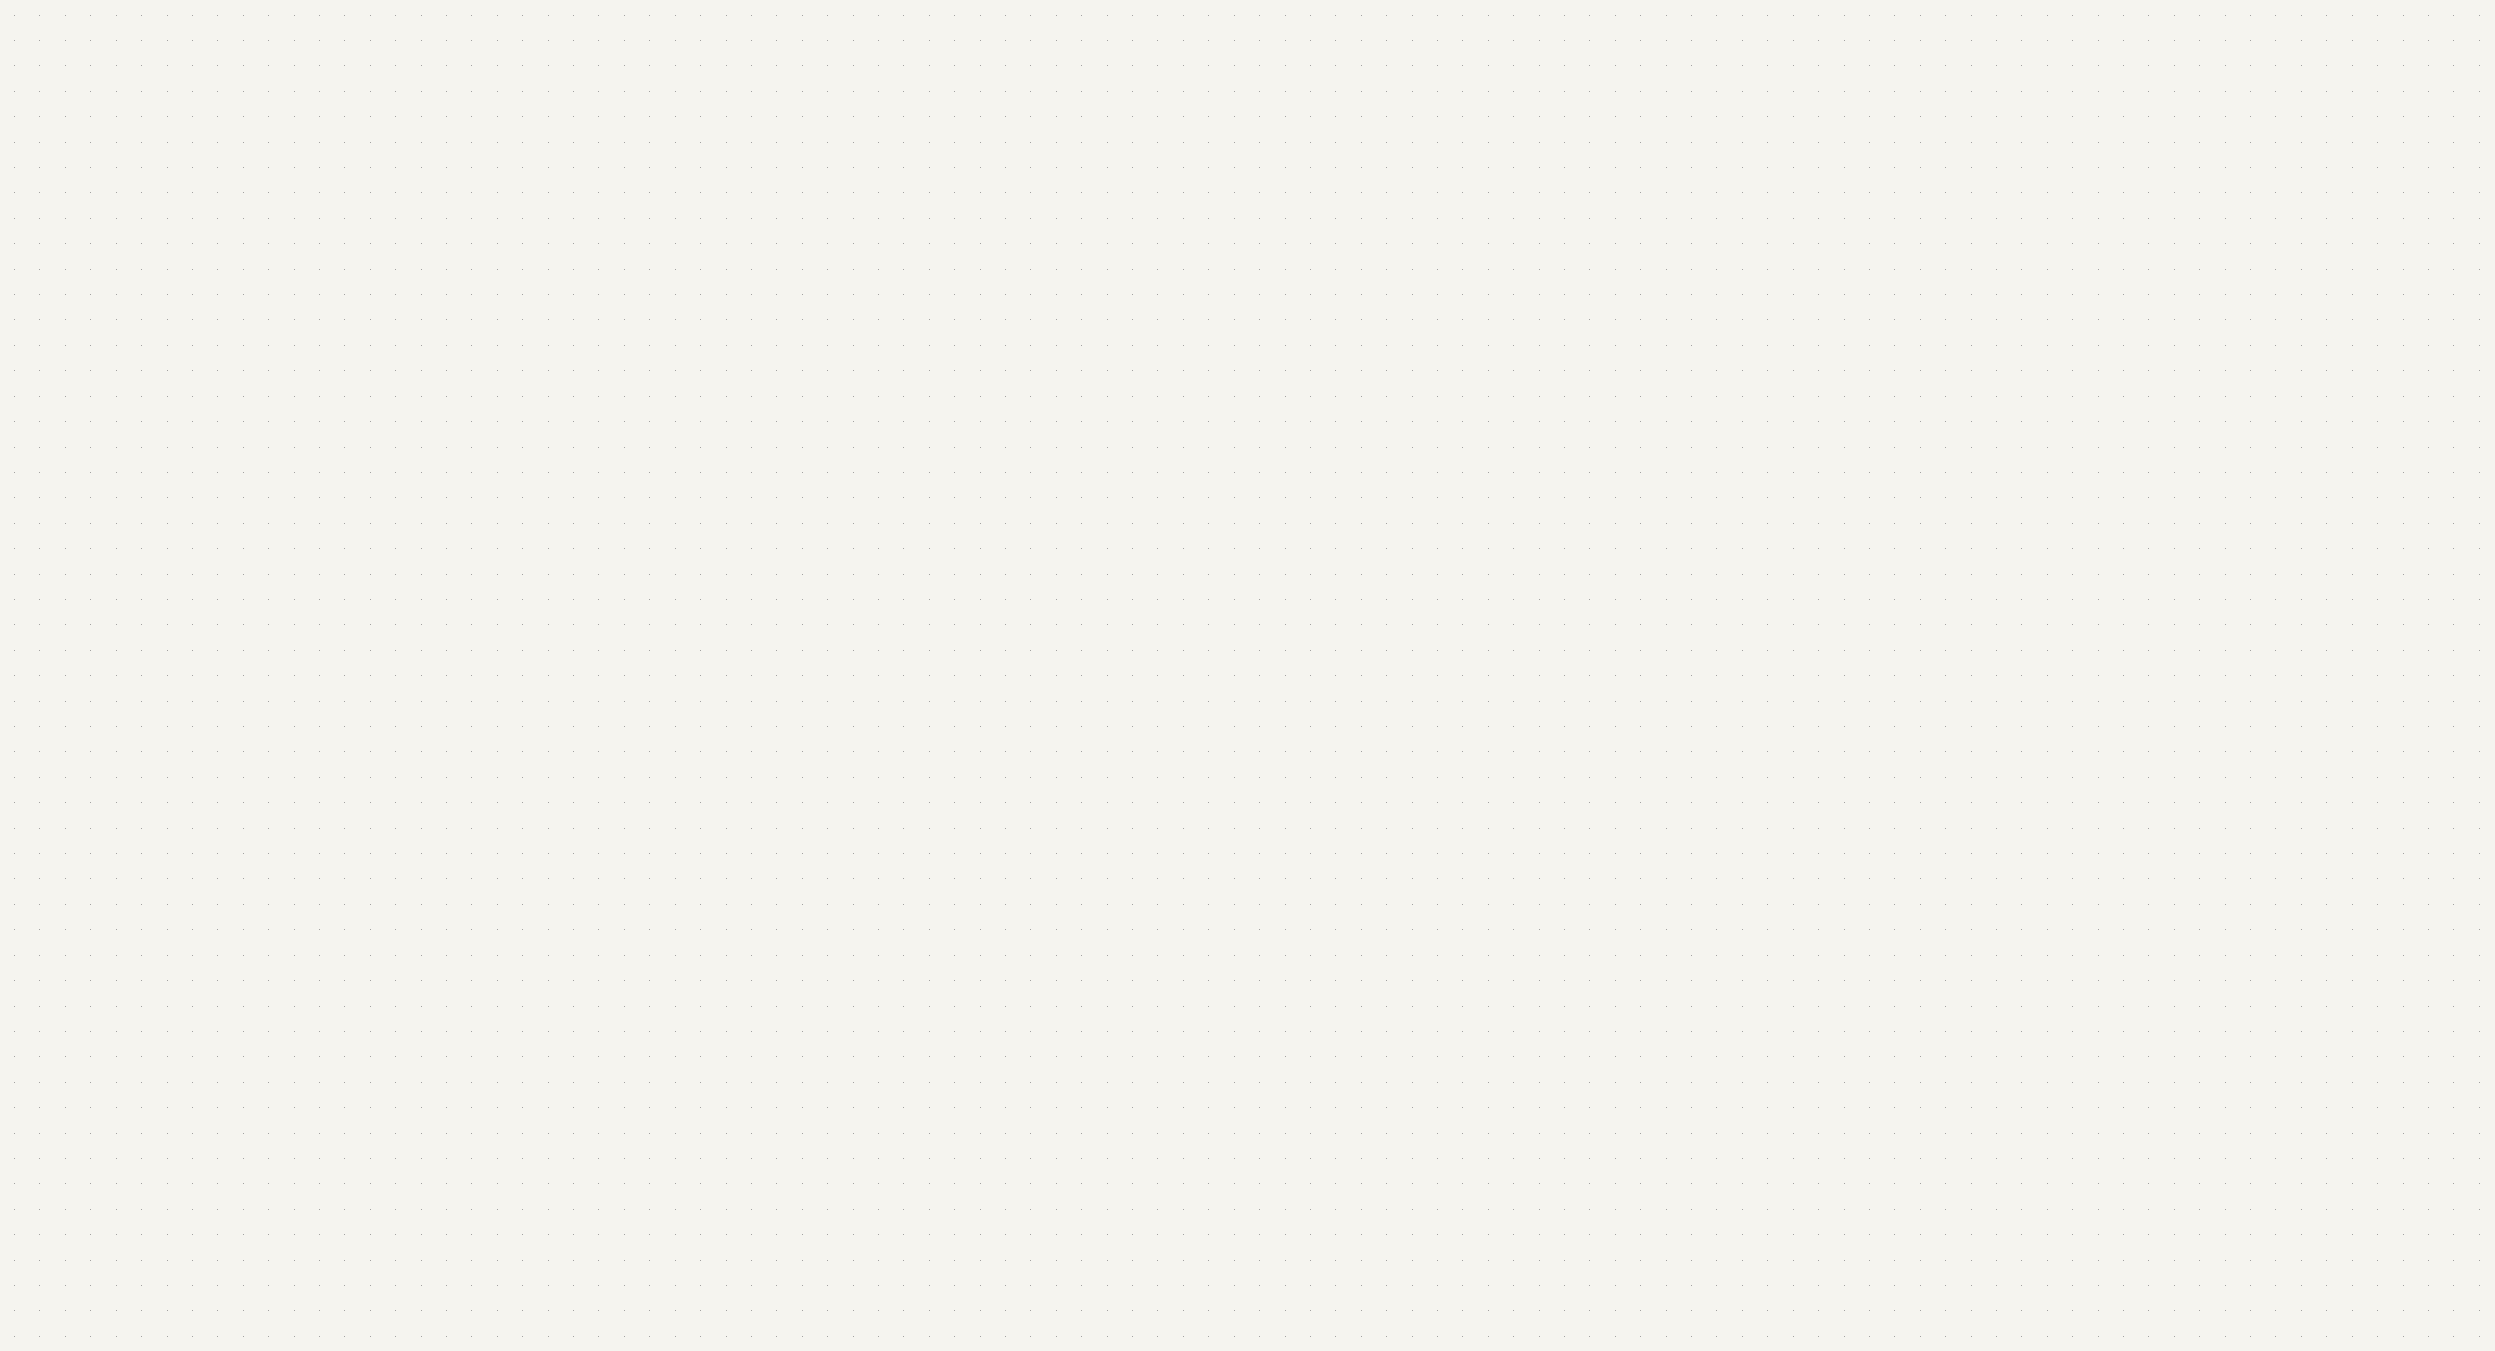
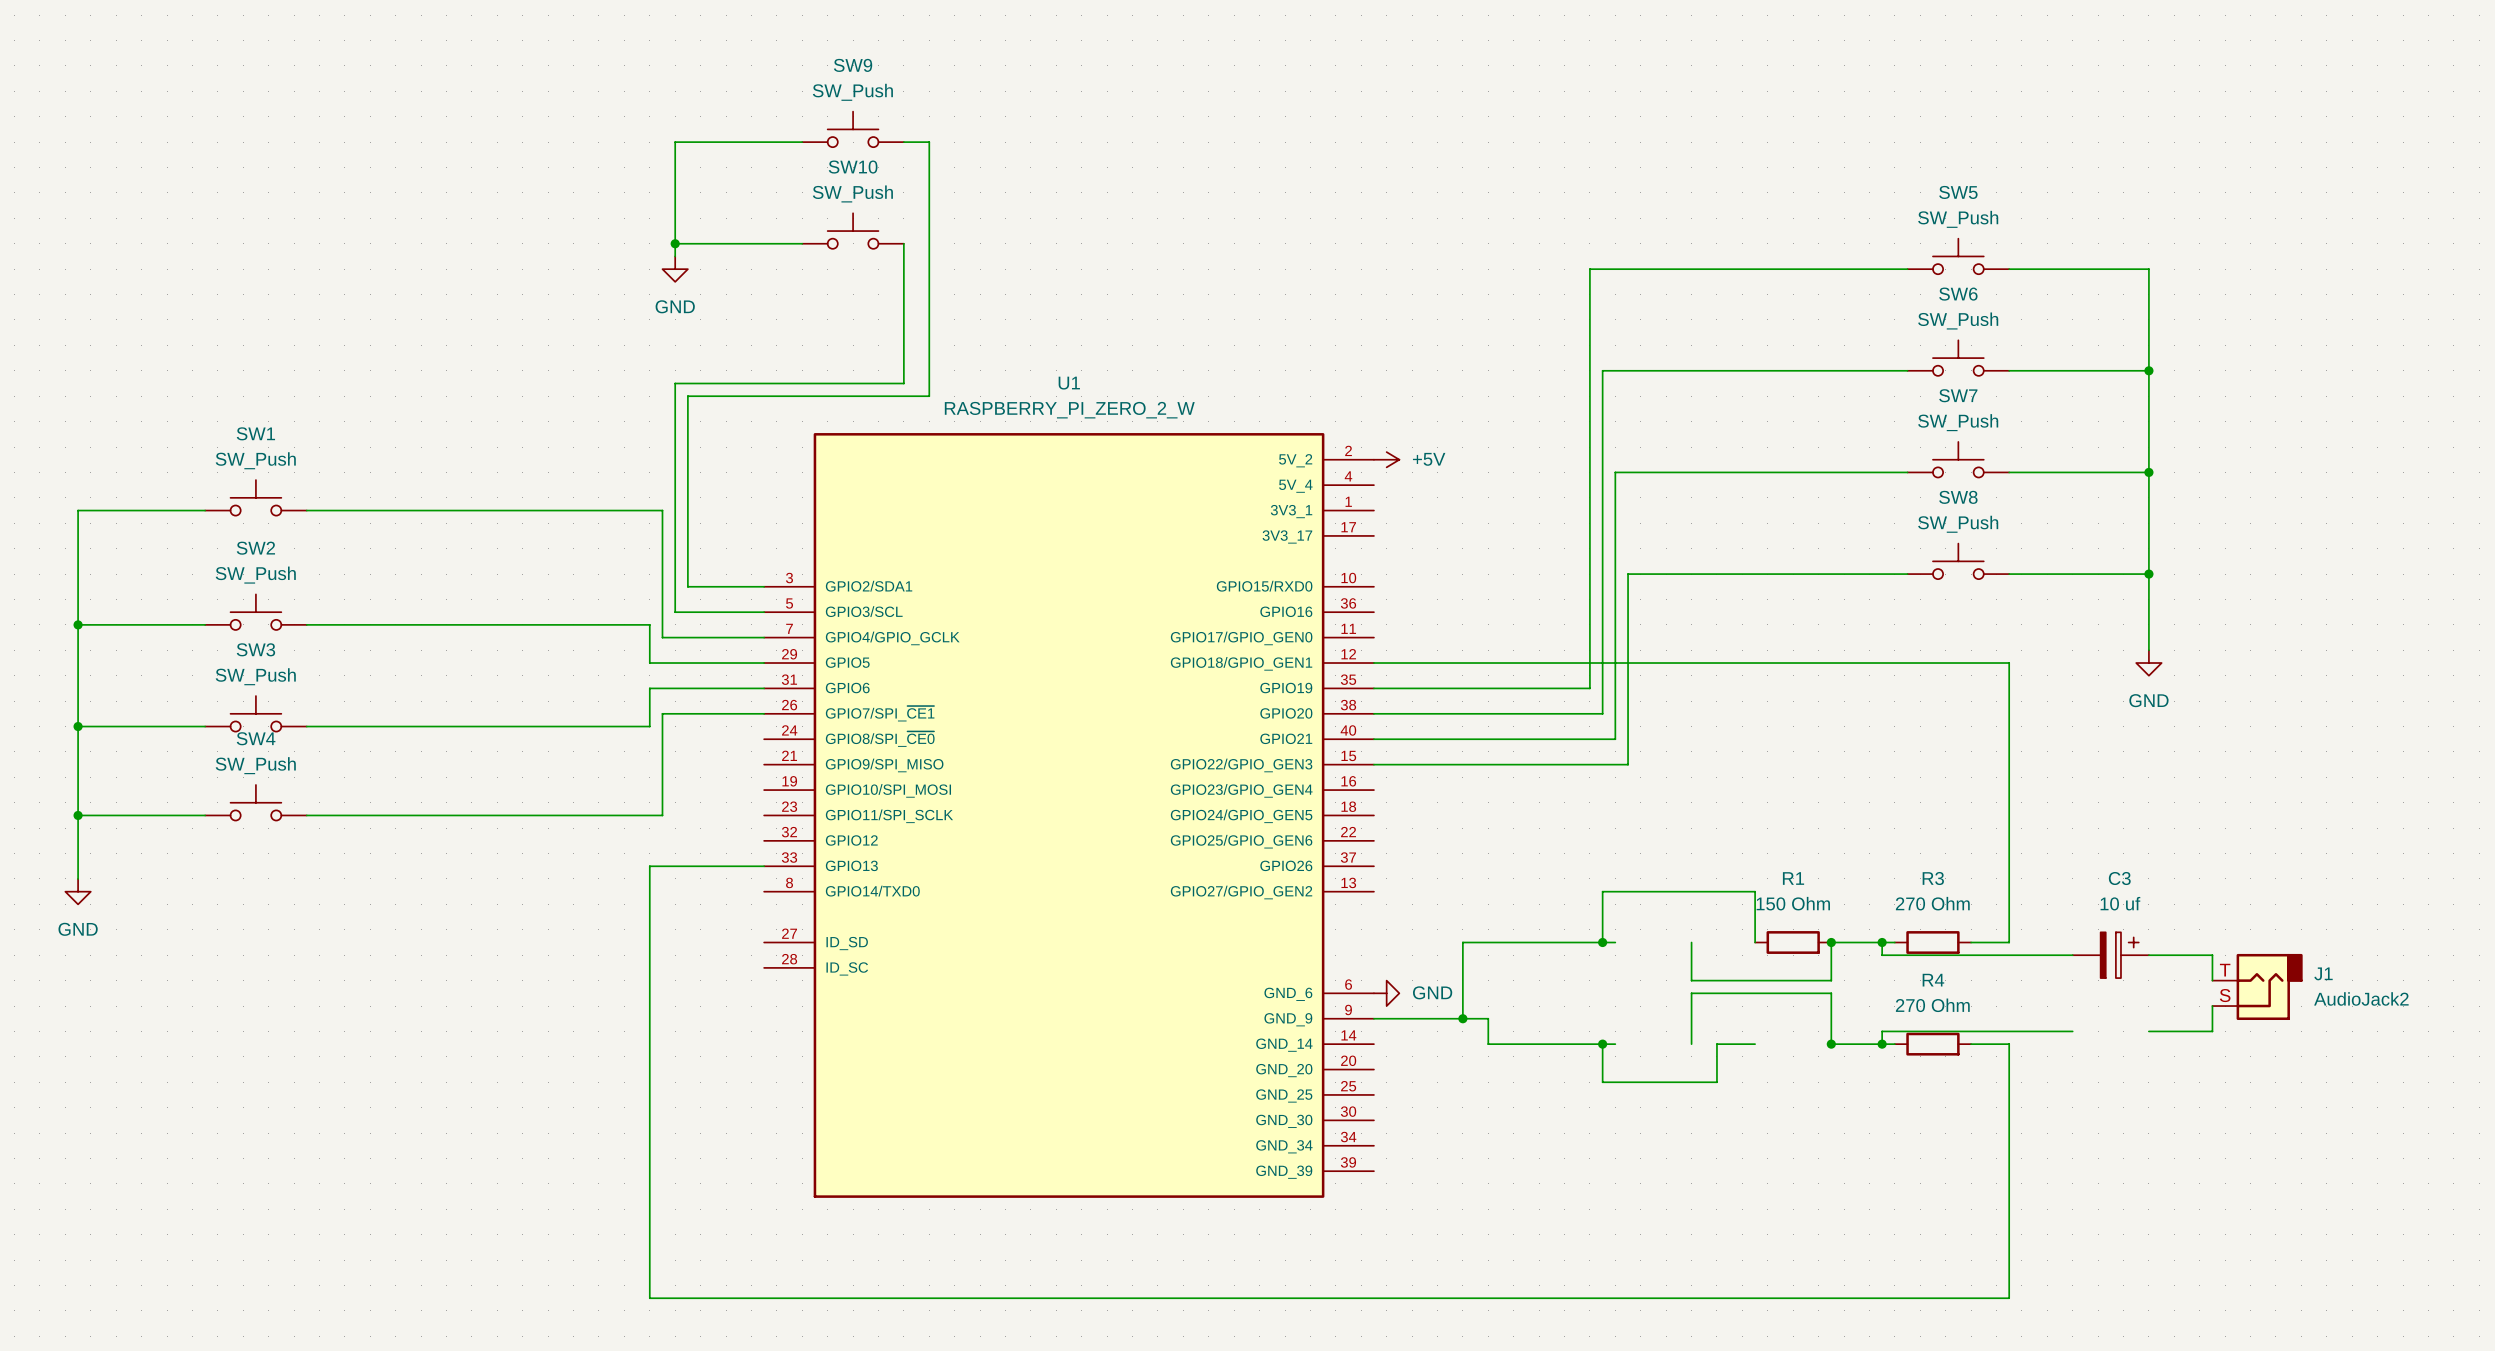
SW9: none -> SW_Push (853, 129)
wire: none -> (802, 142) (675, 142) (675, 256)
wire: none -> (903, 142) (929, 142) (929, 396) (687, 396) (687, 586) (764, 586)
SW10: none -> SW_Push (853, 231)
wire: none -> (675, 243) (802, 243)
junction: none -> (675, 243)
wire: none -> (903, 243) (903, 383) (675, 383) (675, 612) (764, 612)
SW5: none -> SW_Push (1958, 256)
power symbol: none -> GND (675, 269)
wire: none -> (1907, 269) (1589, 269) (1589, 688) (1373, 688)
wire: none -> (2009, 269) (2148, 269) (2148, 650)
SW6: none -> SW_Push (1958, 358)
wire: none -> (1907, 370) (1602, 370) (1602, 713) (1373, 713)
wire: none -> (2009, 370) (2148, 370)
junction: none -> (2148, 370)
power symbol: none -> +5V (1386, 459)
SW7: none -> SW_Push (1958, 459)
wire: none -> (1907, 472) (1615, 472) (1615, 739) (1373, 739)
wire: none -> (2009, 472) (2148, 472)
junction: none -> (2148, 472)
SW1: none -> SW_Push (255, 497)
wire: none -> (205, 510) (78, 510) (78, 878)
wire: none -> (306, 510) (662, 510) (662, 637) (764, 637)
SW8: none -> SW_Push (1958, 561)
wire: none -> (1907, 574) (1628, 574) (1628, 764) (1373, 764)
wire: none -> (2009, 574) (2148, 574)
junction: none -> (2148, 574)
SW2: none -> SW_Push (255, 612)
wire: none -> (78, 624) (205, 624)
junction: none -> (78, 624)
wire: none -> (306, 624) (649, 624) (649, 663) (764, 663)
wire: none -> (1373, 663) (2009, 663) (2009, 942) (1971, 942)
power symbol: none -> GND (2148, 663)
wire: none -> (764, 688) (649, 688) (649, 726) (306, 726)
SW3: none -> SW_Push (255, 713)
wire: none -> (764, 713) (662, 713) (662, 815) (306, 815)
wire: none -> (78, 726) (205, 726)
junction: none -> (78, 726)
SW4: none -> SW_Push (255, 802)
wire: none -> (78, 815) (205, 815)
junction: none -> (78, 815)
U1: none -> RASPBERRY_PI_ZERO_2_W (1069, 815)
wire: none -> (764, 866) (649, 866) (649, 1298) (2009, 1298) (2009, 1044) (1971, 1044)
power symbol: none -> GND (78, 891)
wire: none -> (1602, 942) (1602, 891) (1755, 891) (1755, 942)
junction: none -> (1602, 942)
wire: none -> (1615, 942) (1462, 942) (1462, 1018)
wire: none -> (1691, 942) (1691, 980) (1831, 980) (1831, 942) (1894, 942)
R1: none -> 150 Ohm (1793, 942)
junction: none -> (1831, 942)
wire: none -> (1882, 942) (1882, 955) (2072, 955)
junction: none -> (1882, 942)
R3: none -> 270 Ohm (1932, 942)
C3: none -> 10 uf (2110, 955)
wire: none -> (2148, 955) (2212, 955) (2212, 980)
J1: none -> AudioJack2 (2257, 986)
power symbol: none -> GND (1386, 993)
wire: none -> (2212, 1006) (2212, 1031) (2148, 1031)
wire: none -> (1373, 1018) (1488, 1018) (1488, 1044) (1615, 1044)
junction: none -> (1462, 1018)
wire: none -> (2072, 1031) (1882, 1031) (1882, 1044)
wire: none -> (1602, 1044) (1602, 1082) (1716, 1082) (1716, 1044) (1755, 1044)
junction: none -> (1602, 1044)
wire: none -> (1691, 1044) (1691, 993) (1831, 993) (1831, 1044) (1894, 1044)
junction: none -> (1831, 1044)
junction: none -> (1882, 1044)
R4: none -> 270 Ohm (1932, 1044)

